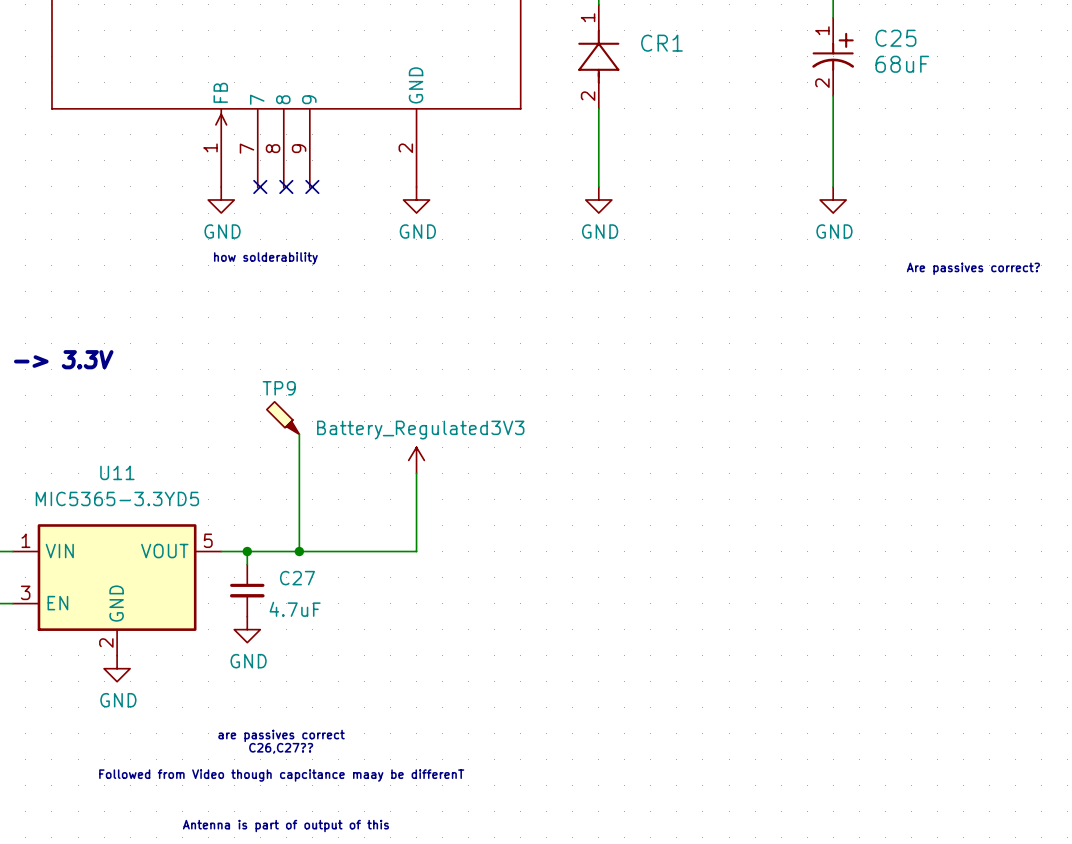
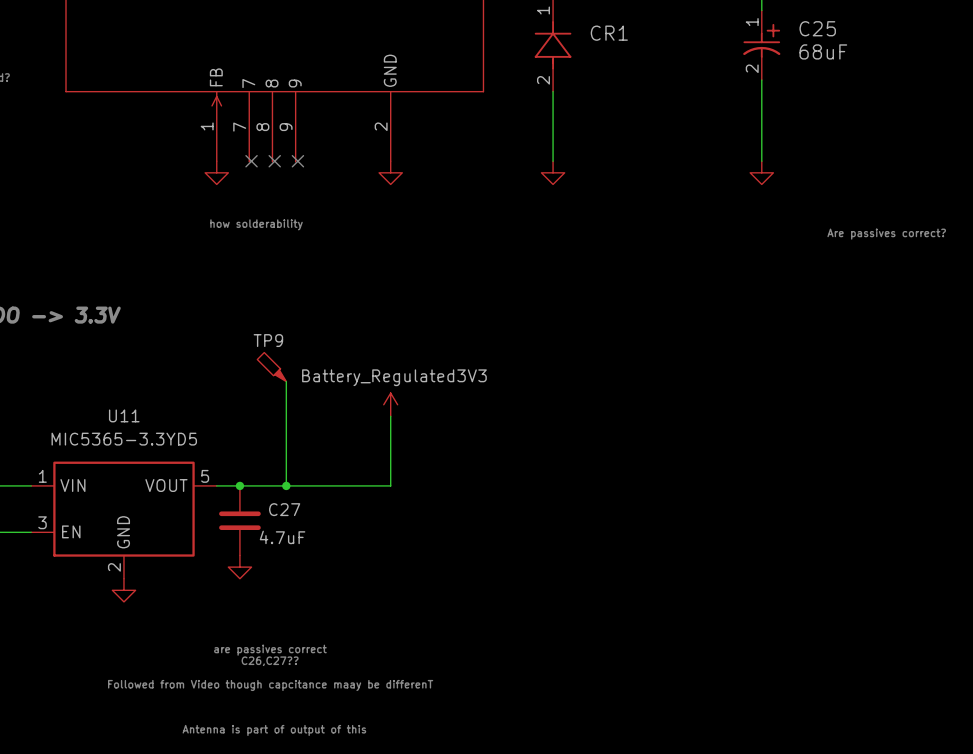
power symbol text: GND (222, 231) -> none
power symbol text: GND (417, 231) -> none
power symbol text: GND (600, 231) -> none
power symbol text: GND (834, 231) -> none
C27 symbol: [229, 564, 265, 617] -> [219, 485, 261, 556]
power symbol: GND (247, 629) -> none
power symbol: none -> (239, 567)
power symbol text: GND (118, 700) -> none

